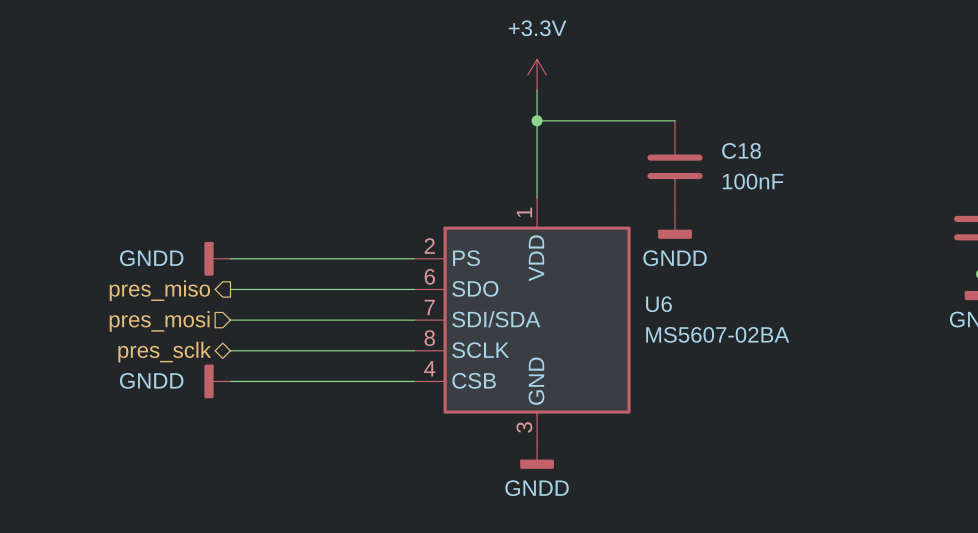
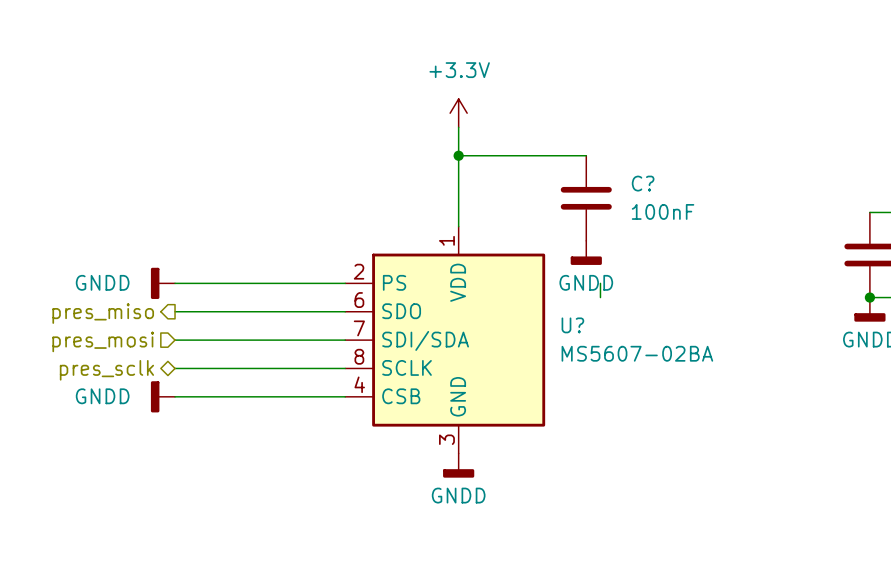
C18 name: C18 (741, 150) -> C? (643, 183)
wire: none -> (600, 283) (600, 297)
U6 name: U6 (658, 304) -> U? (572, 325)

